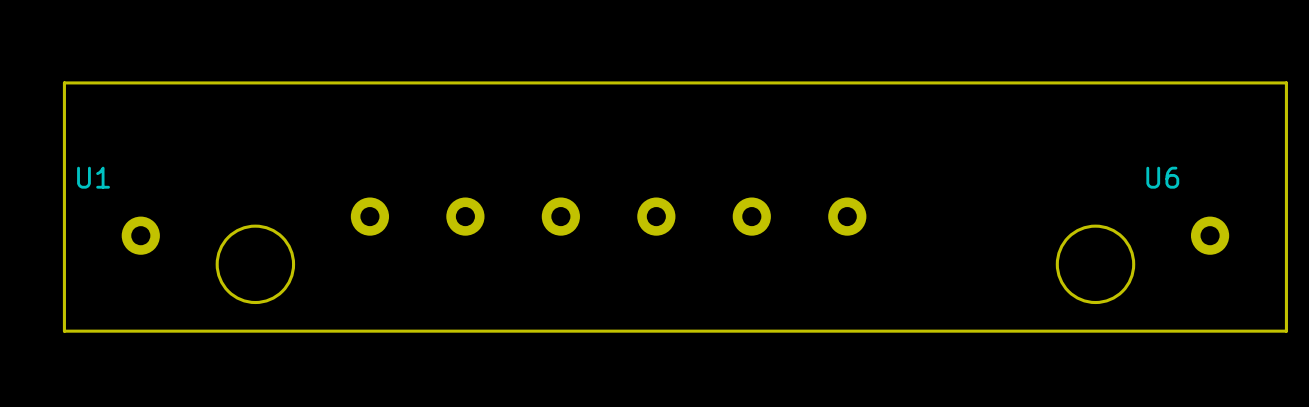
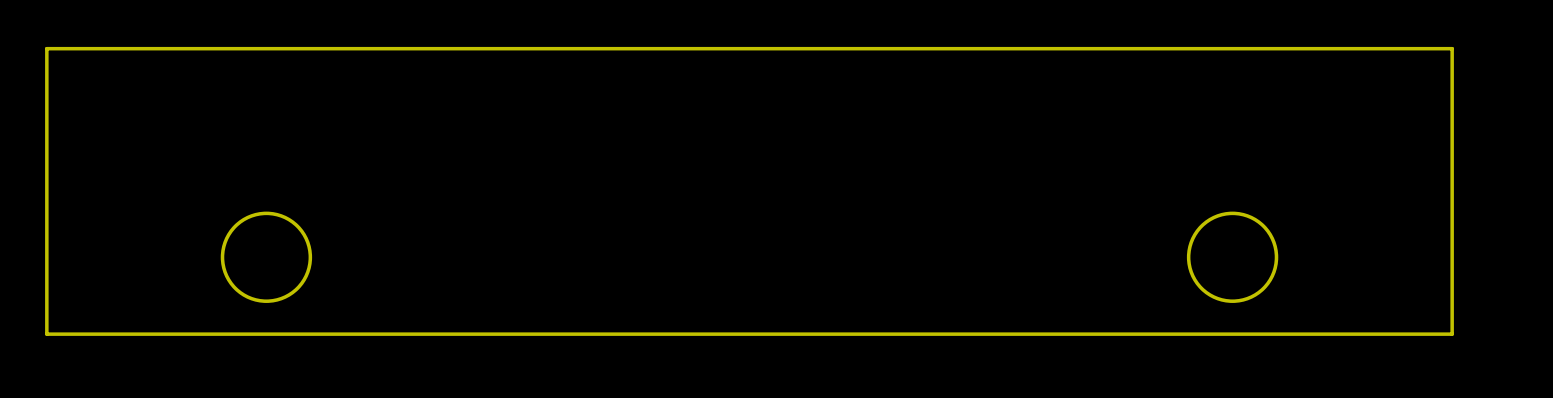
part: (369, 216) -> none
part: (465, 216) -> none
part: (560, 216) -> none
part: (656, 216) -> none
part: (751, 216) -> none
part: (847, 216) -> none
U1: (140, 235) -> none
U6: (1210, 235) -> none

